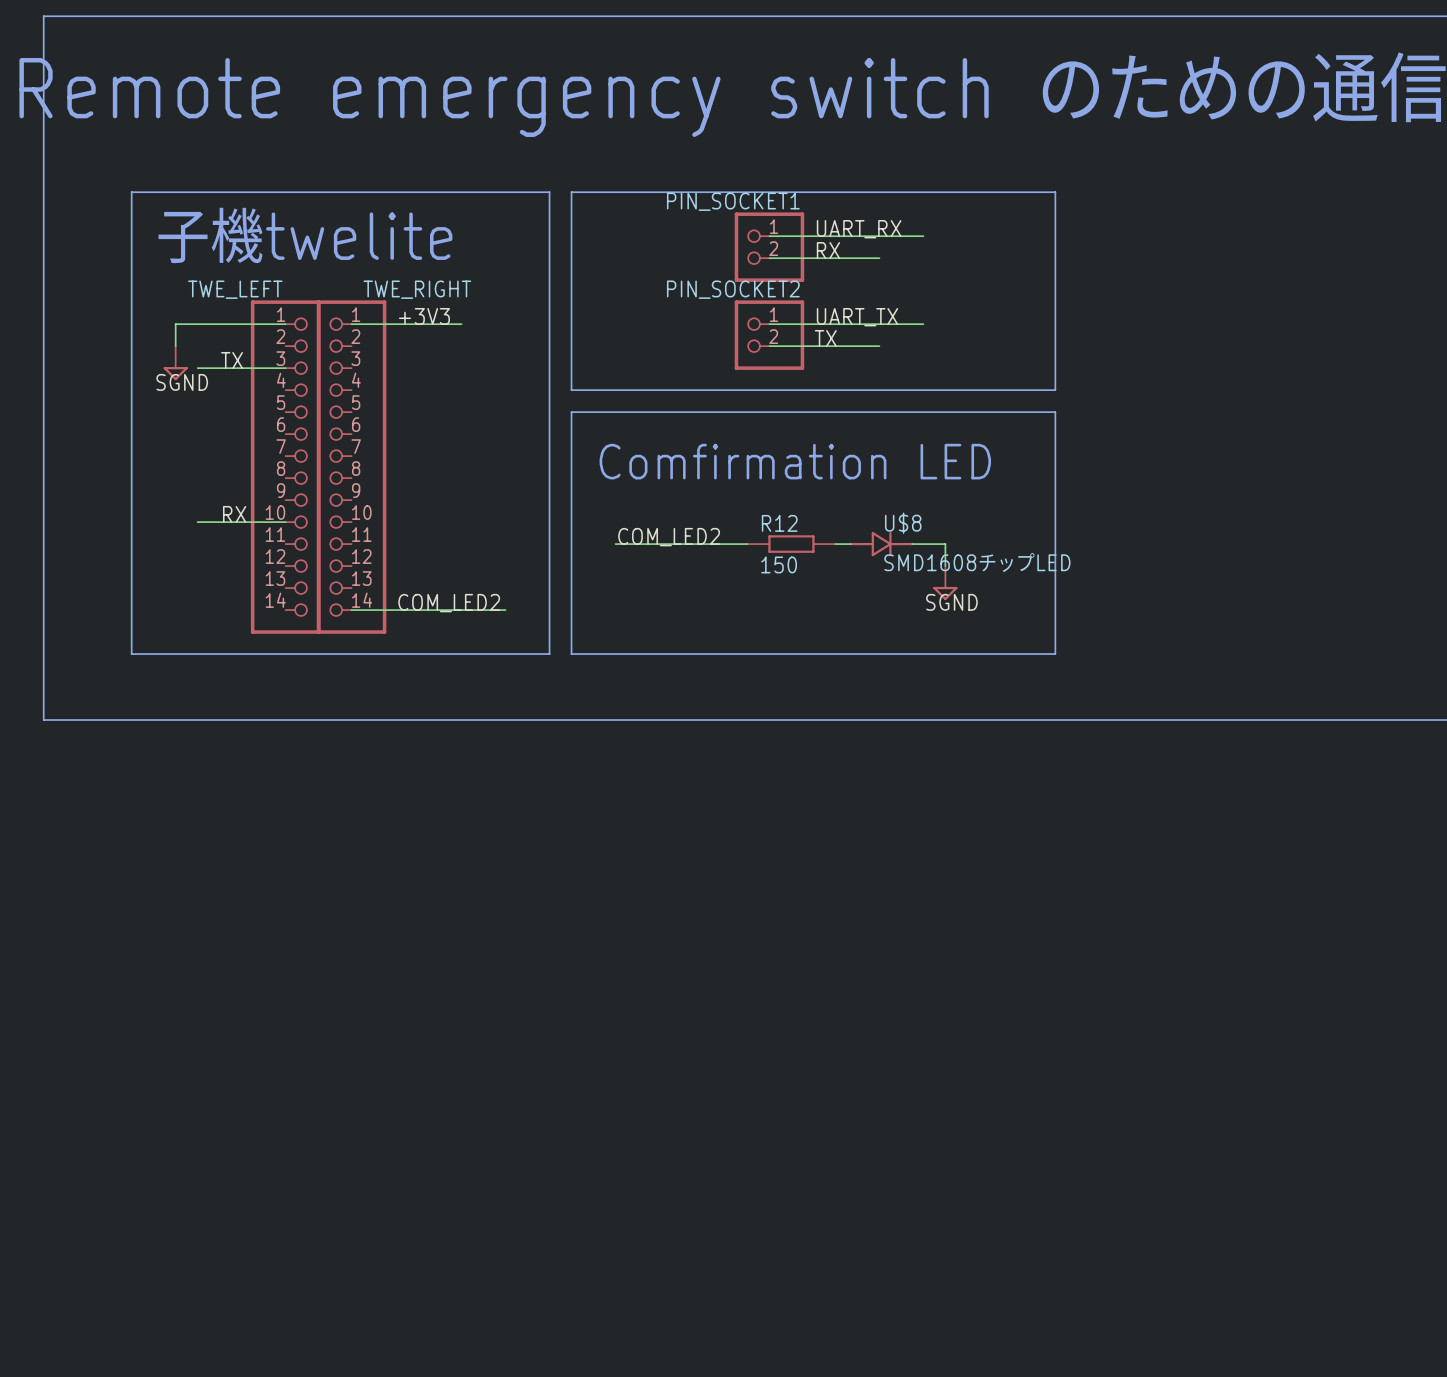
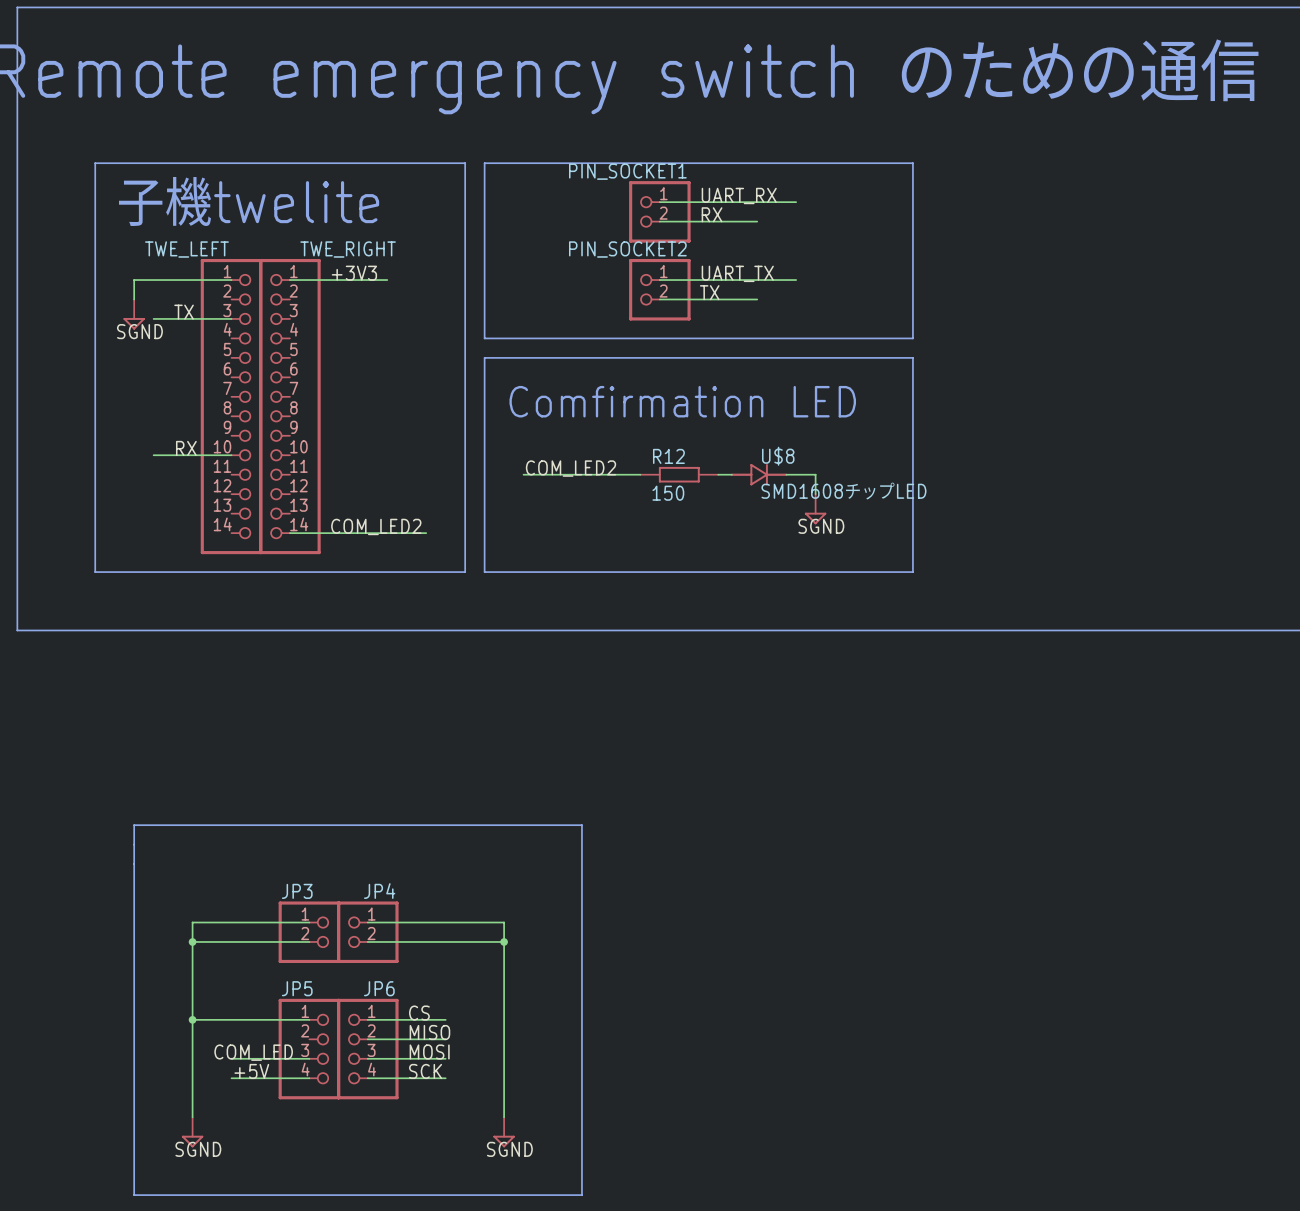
line: none -> (134, 825) (134, 1195) (581, 1195) (581, 825) (134, 825)
wire: none -> (309, 922) (192, 922) (192, 1117)
wire: none -> (367, 922) (504, 922) (504, 1117)
JP3: none -> (309, 932)
JP4: none -> (367, 932)
wire: none -> (192, 941) (309, 941)
junction: none -> (192, 941)
wire: none -> (367, 941) (504, 941)
junction: none -> (504, 941)
label: none -> CS (419, 1013)
wire: none -> (192, 1019) (309, 1019)
junction: none -> (192, 1019)
wire: none -> (367, 1019) (445, 1019)
label: none -> MISO (429, 1032)
wire: none -> (367, 1039) (445, 1039)
JP5: none -> (309, 1049)
JP6: none -> (367, 1049)
label: none -> COM_LED (253, 1052)
label: none -> MOSI (429, 1051)
wire: none -> (231, 1058) (309, 1058)
wire: none -> (367, 1058) (445, 1058)
label: none -> +5V (251, 1071)
label: none -> SCK (425, 1071)
wire: none -> (231, 1078) (309, 1078)
wire: none -> (367, 1078) (445, 1078)
power symbol: none -> (192, 1132)
power symbol: none -> (504, 1132)
label: none -> SGND (198, 1149)
label: none -> SGND (509, 1149)

